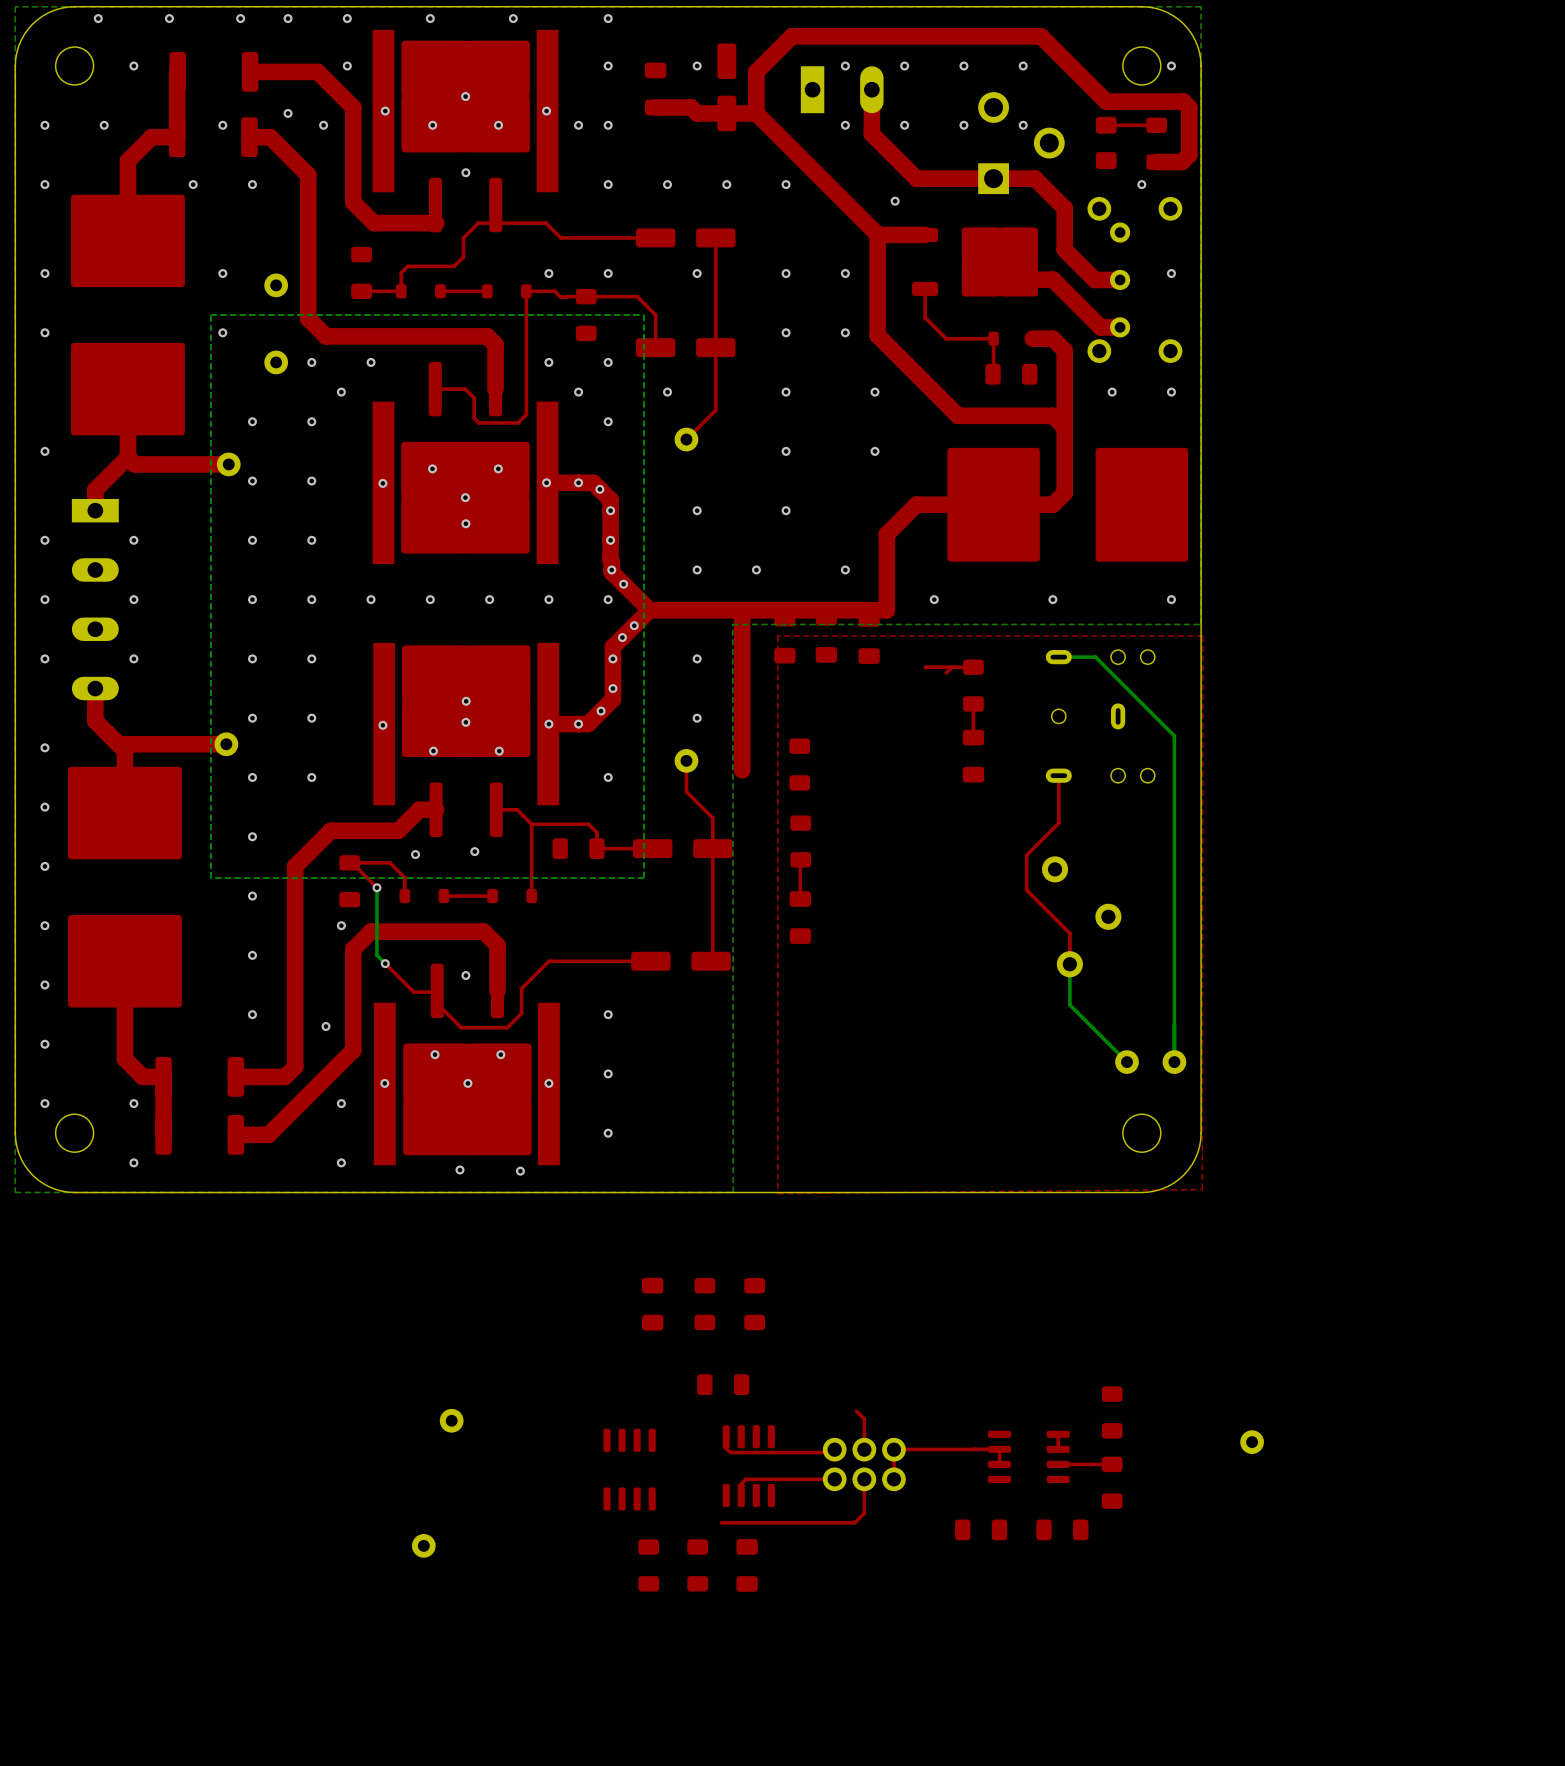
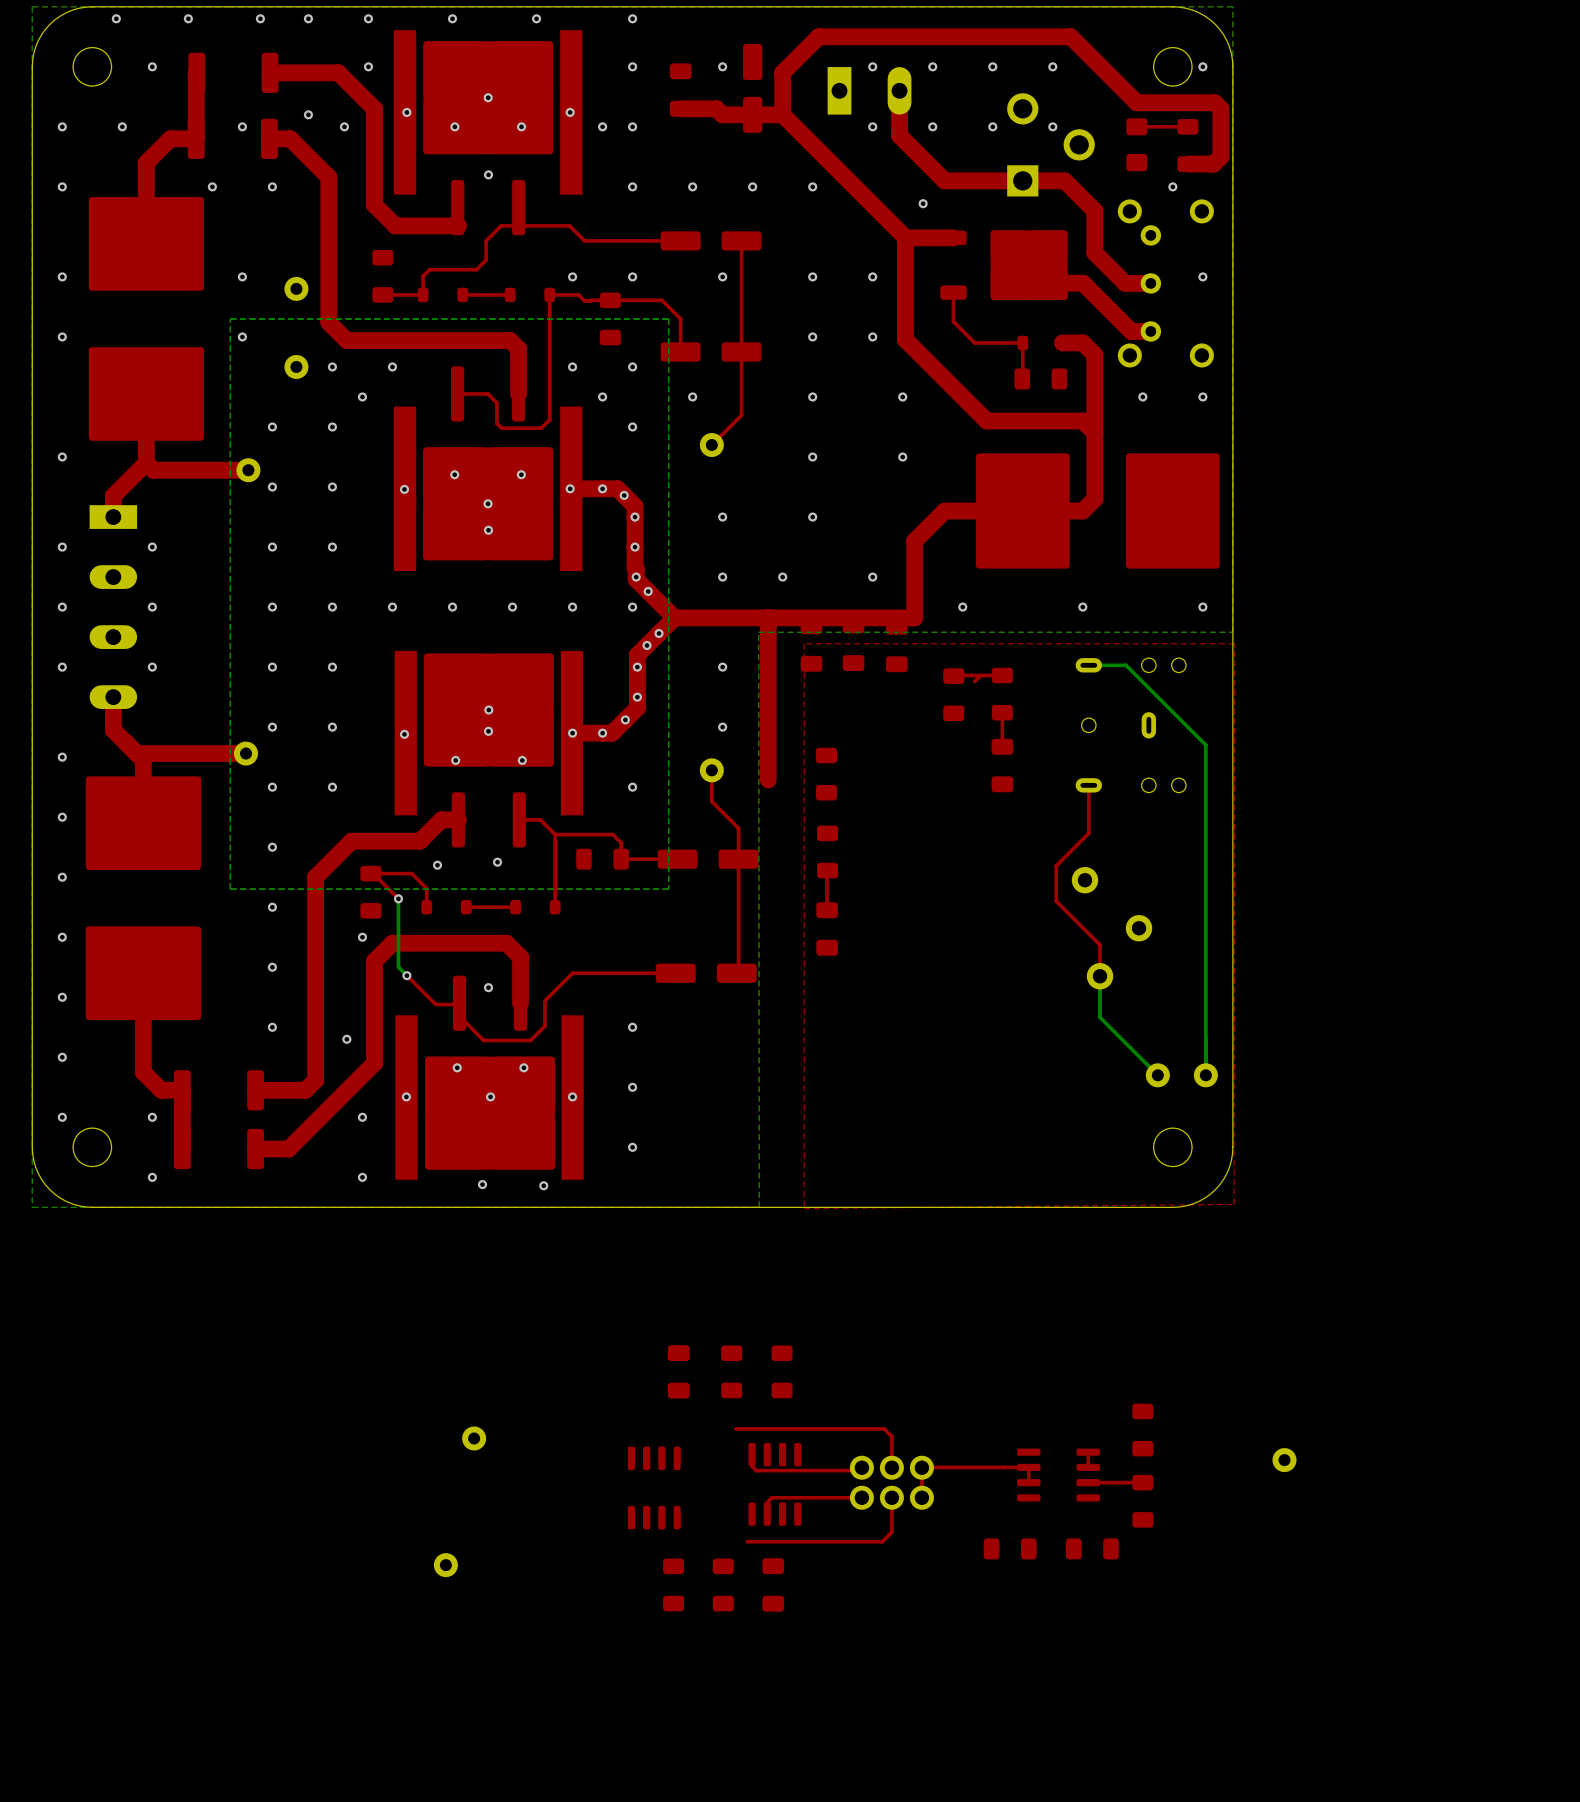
part: none -> (953, 694)
part position: (652, 1304) -> (678, 1371)
part: (704, 1304) -> none
part: (754, 1304) -> none
part: none -> (731, 1371)
part: none -> (782, 1371)
part: (723, 1384) -> none
top track: none -> (884, 1428) (735, 1428)

